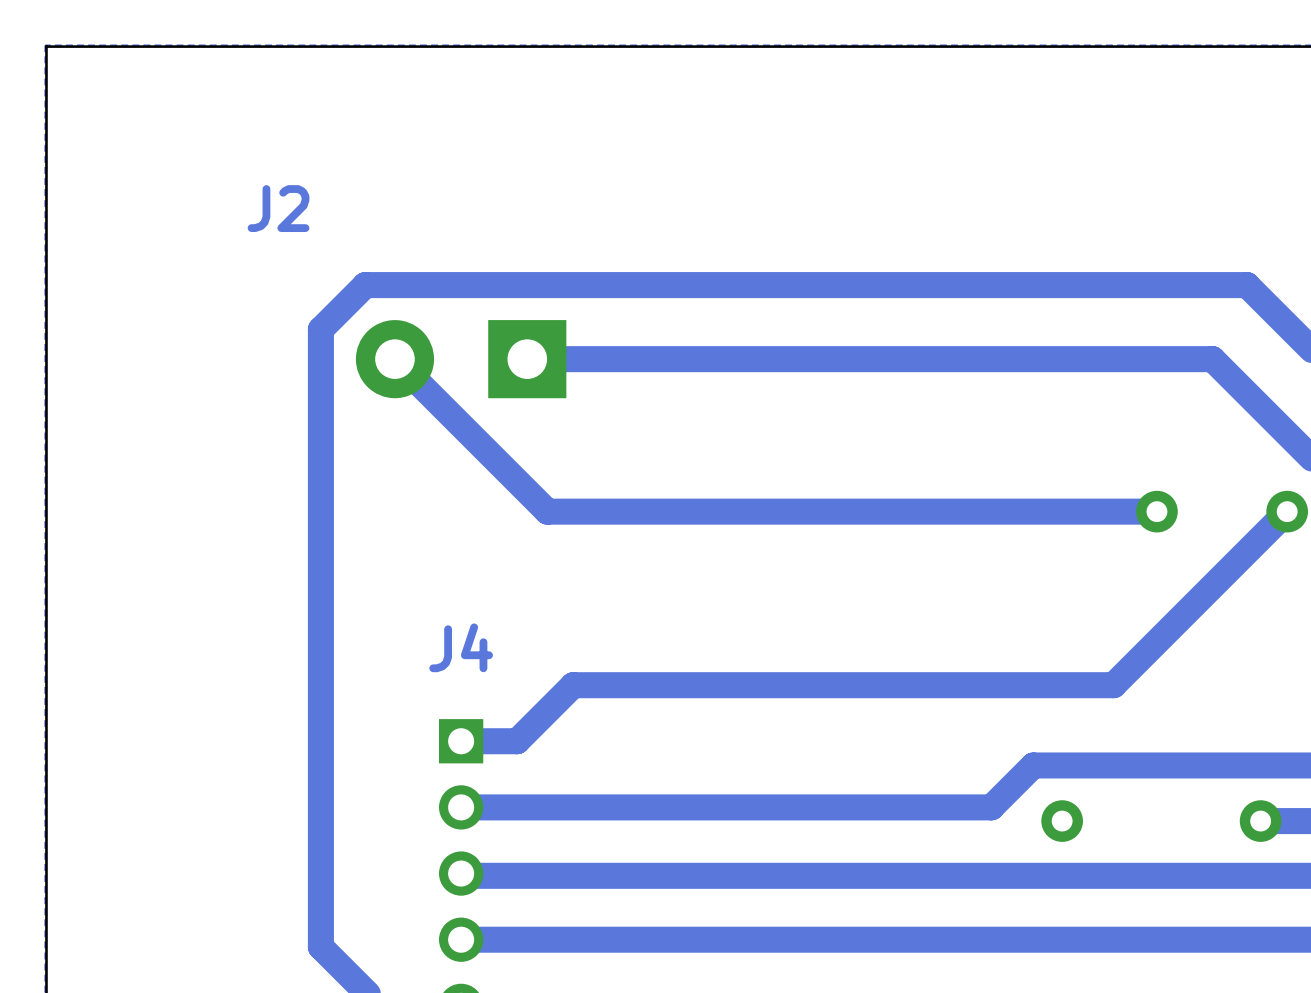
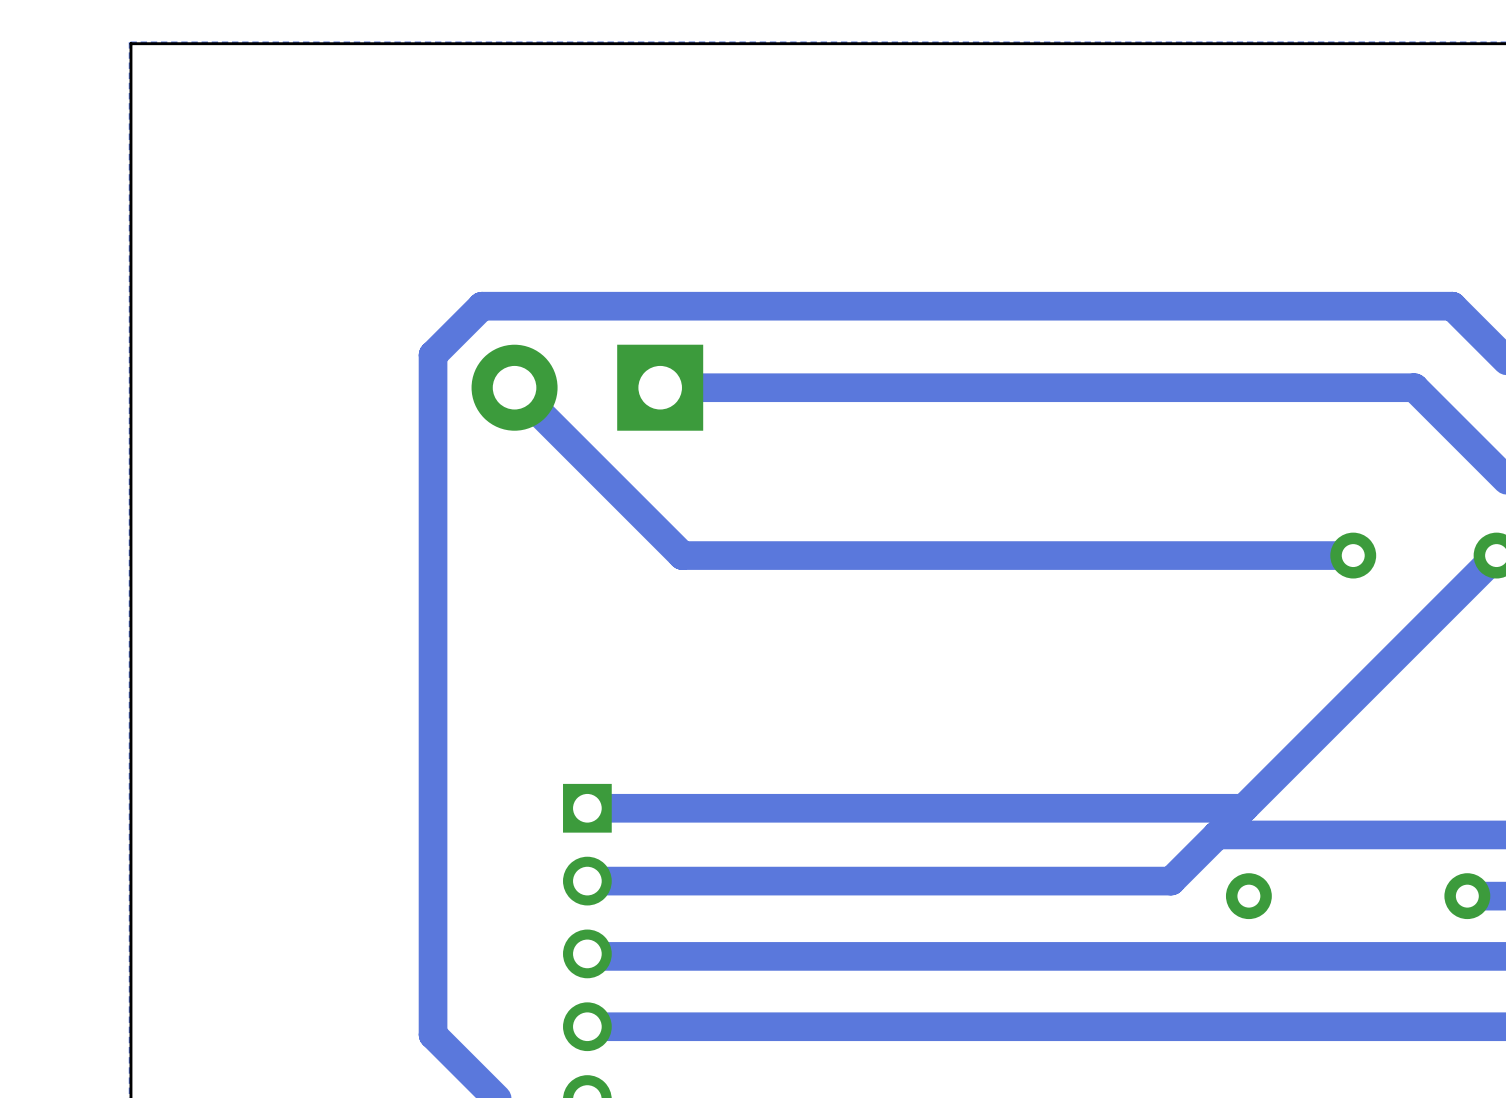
text: J2 (278, 208) -> none
text: J4 (461, 647) -> none
bottom track: (1113, 685) (573, 685) (517, 741) -> (1305, 746) (1243, 808) (649, 808)

